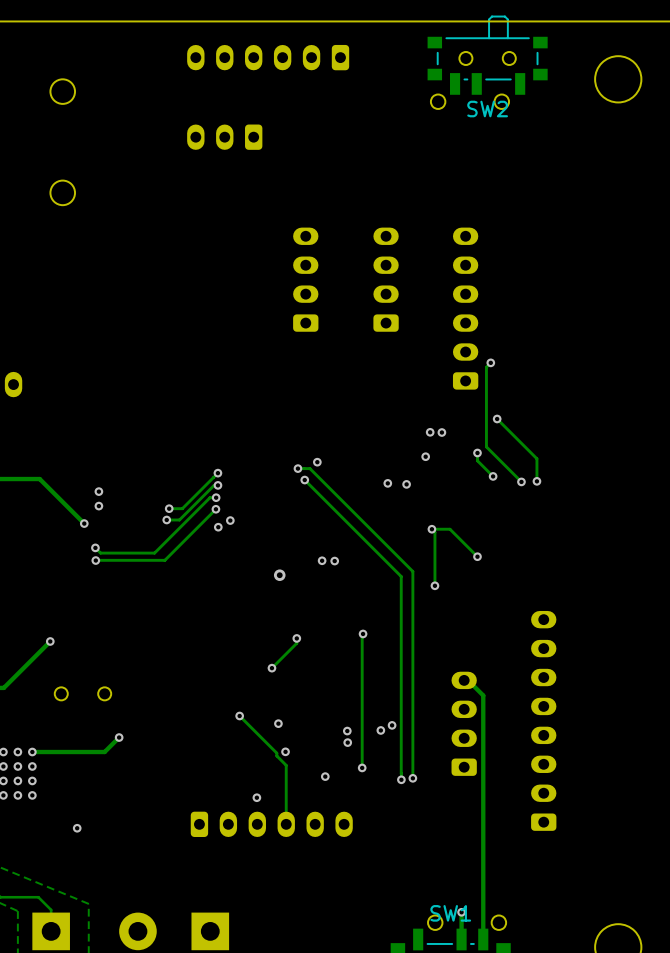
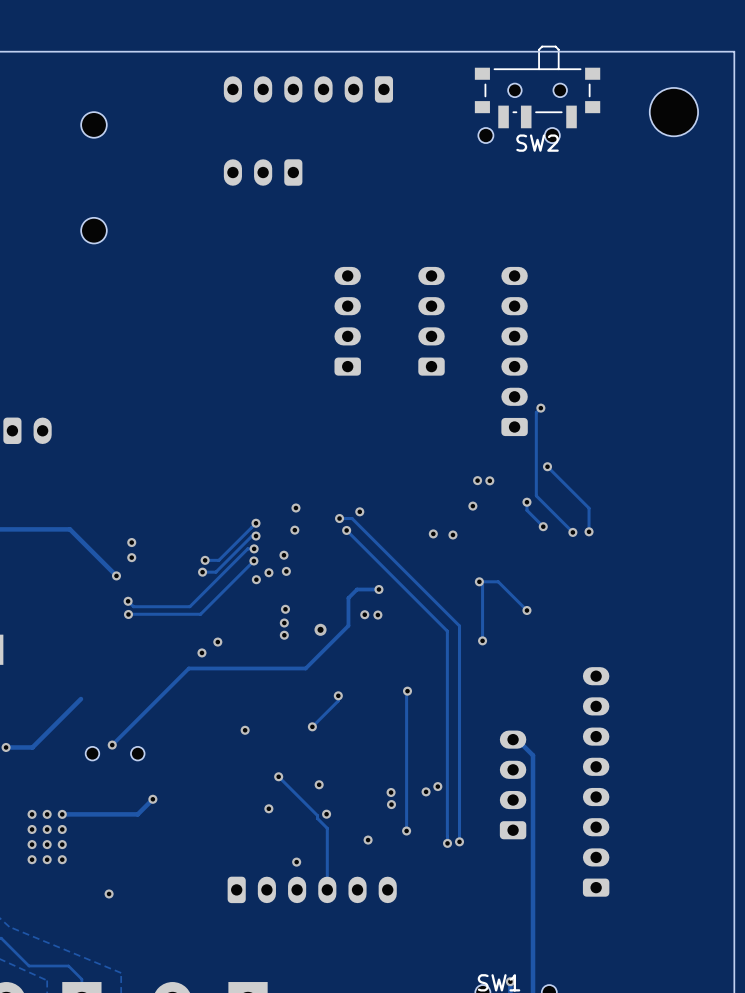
via: none -> (295, 508)
via: none -> (294, 530)
via: none -> (283, 555)
via: none -> (286, 571)
track: none -> (378, 589) (357, 589) (348, 598) (348, 625) (305, 668) (188, 668) (112, 745)
via: none -> (378, 589)
via: none -> (285, 609)
via: none -> (284, 623)
via: none -> (284, 635)
via: none -> (217, 642)
via: none -> (201, 652)
via: (50, 641) -> none
via: none -> (245, 730)
via: none -> (112, 745)
via: none -> (268, 808)

